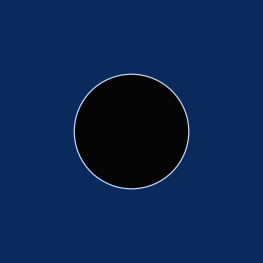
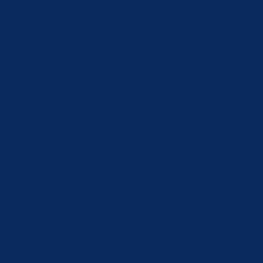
part: (131, 131) -> none

